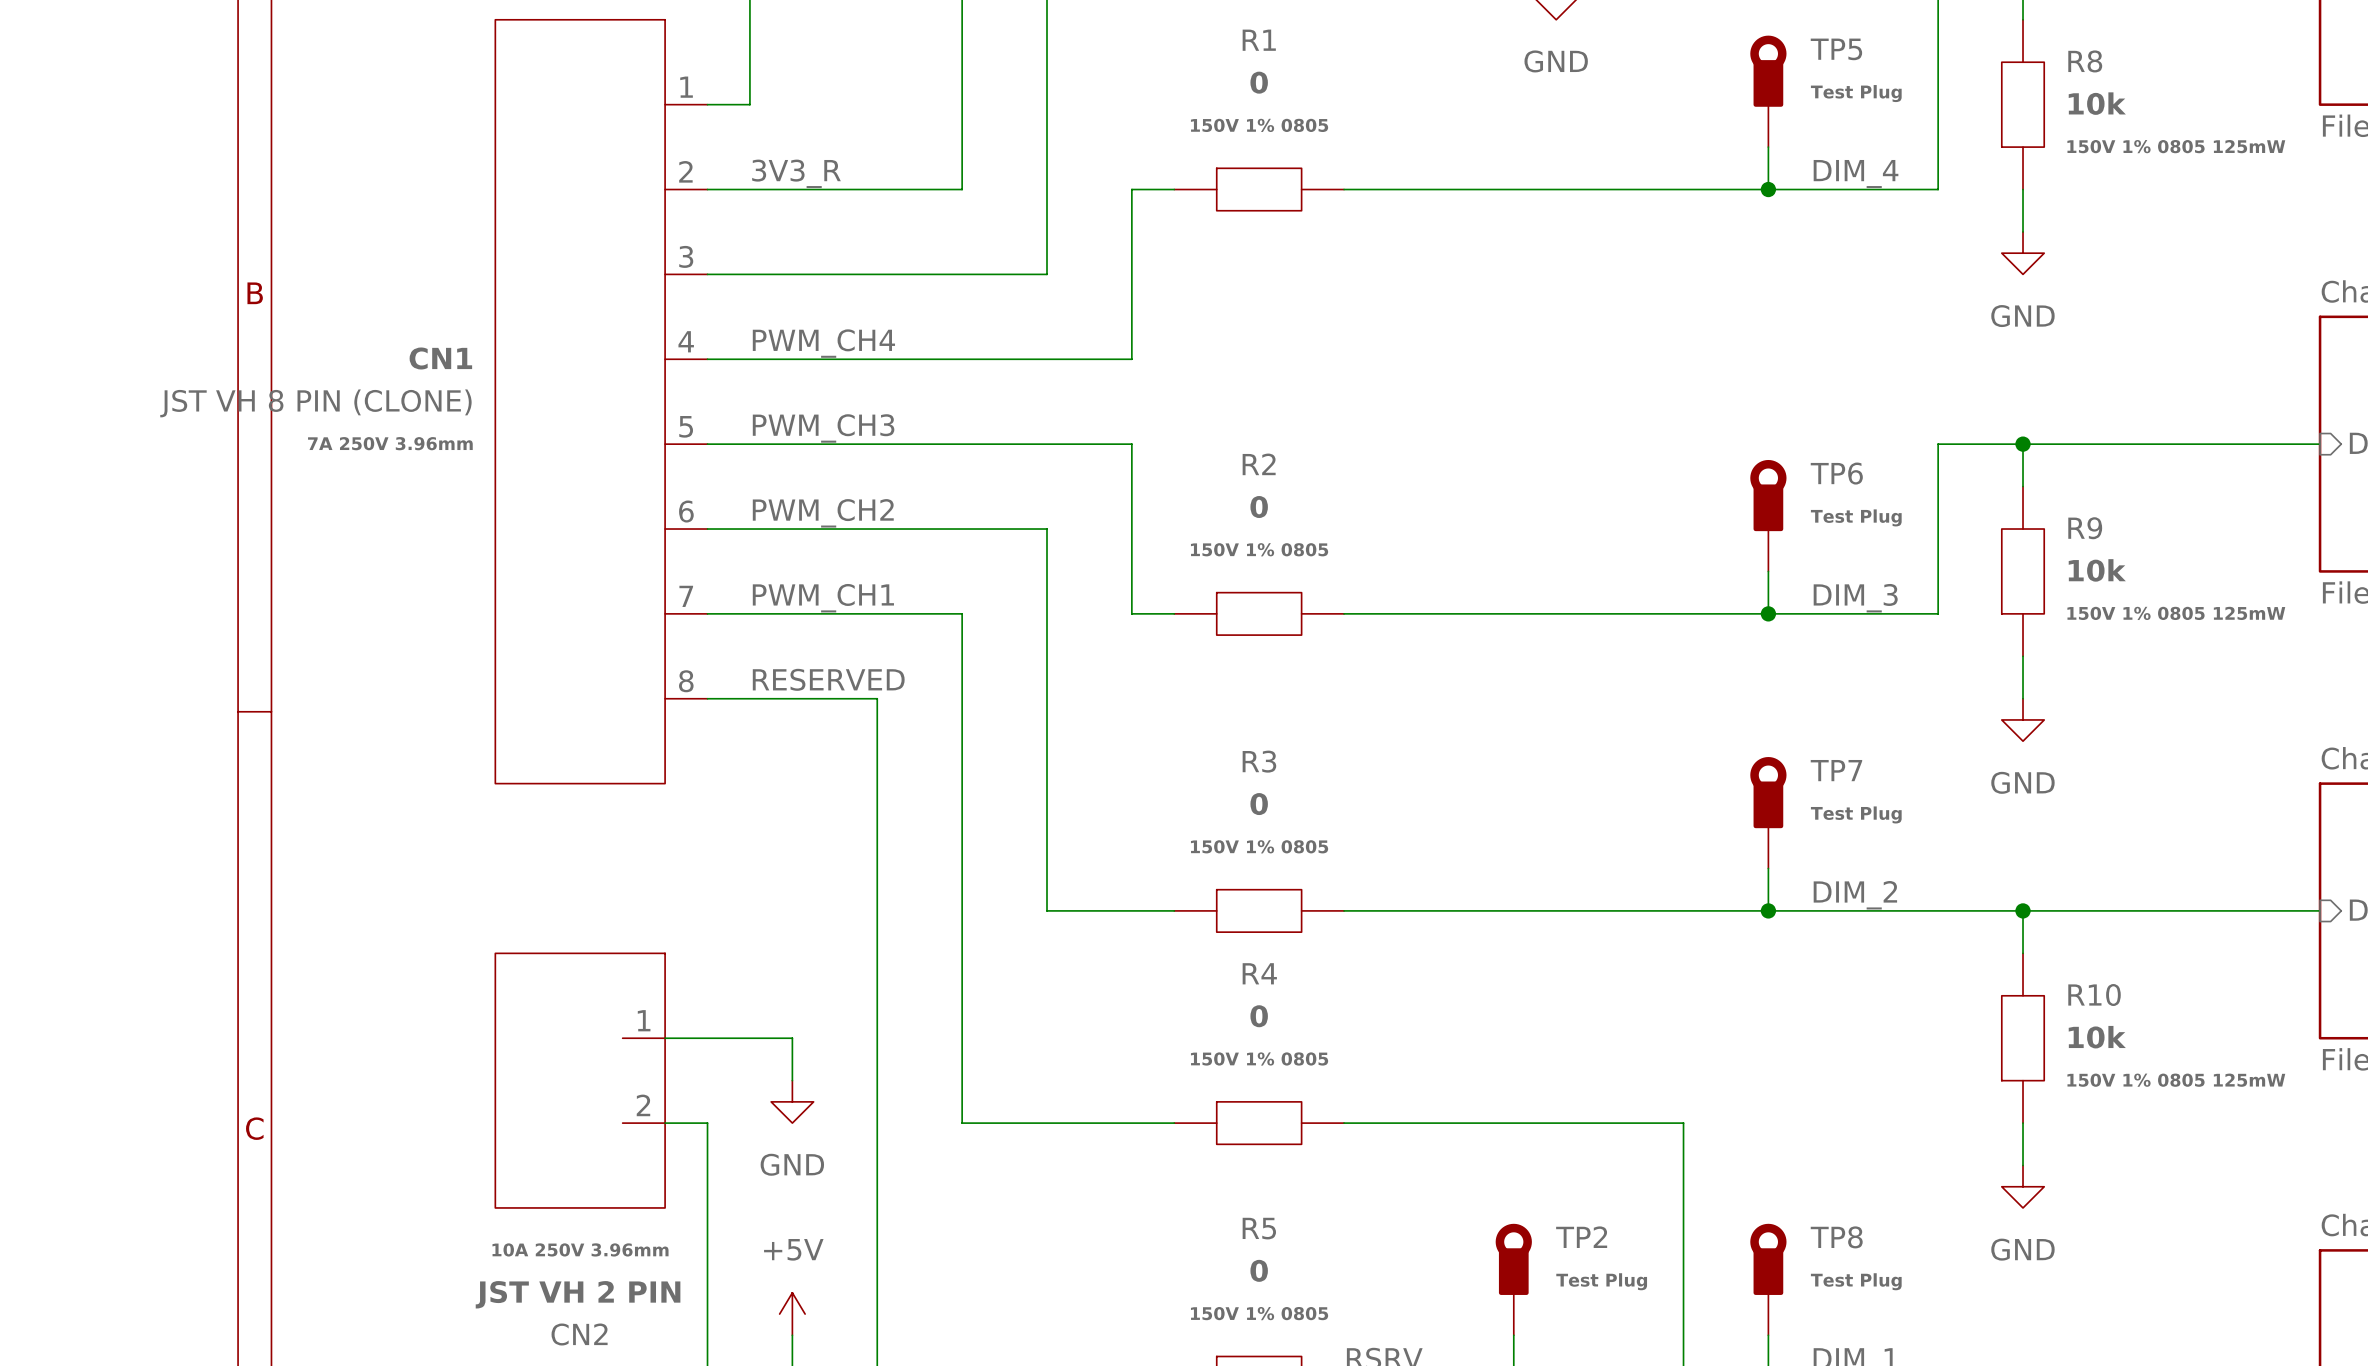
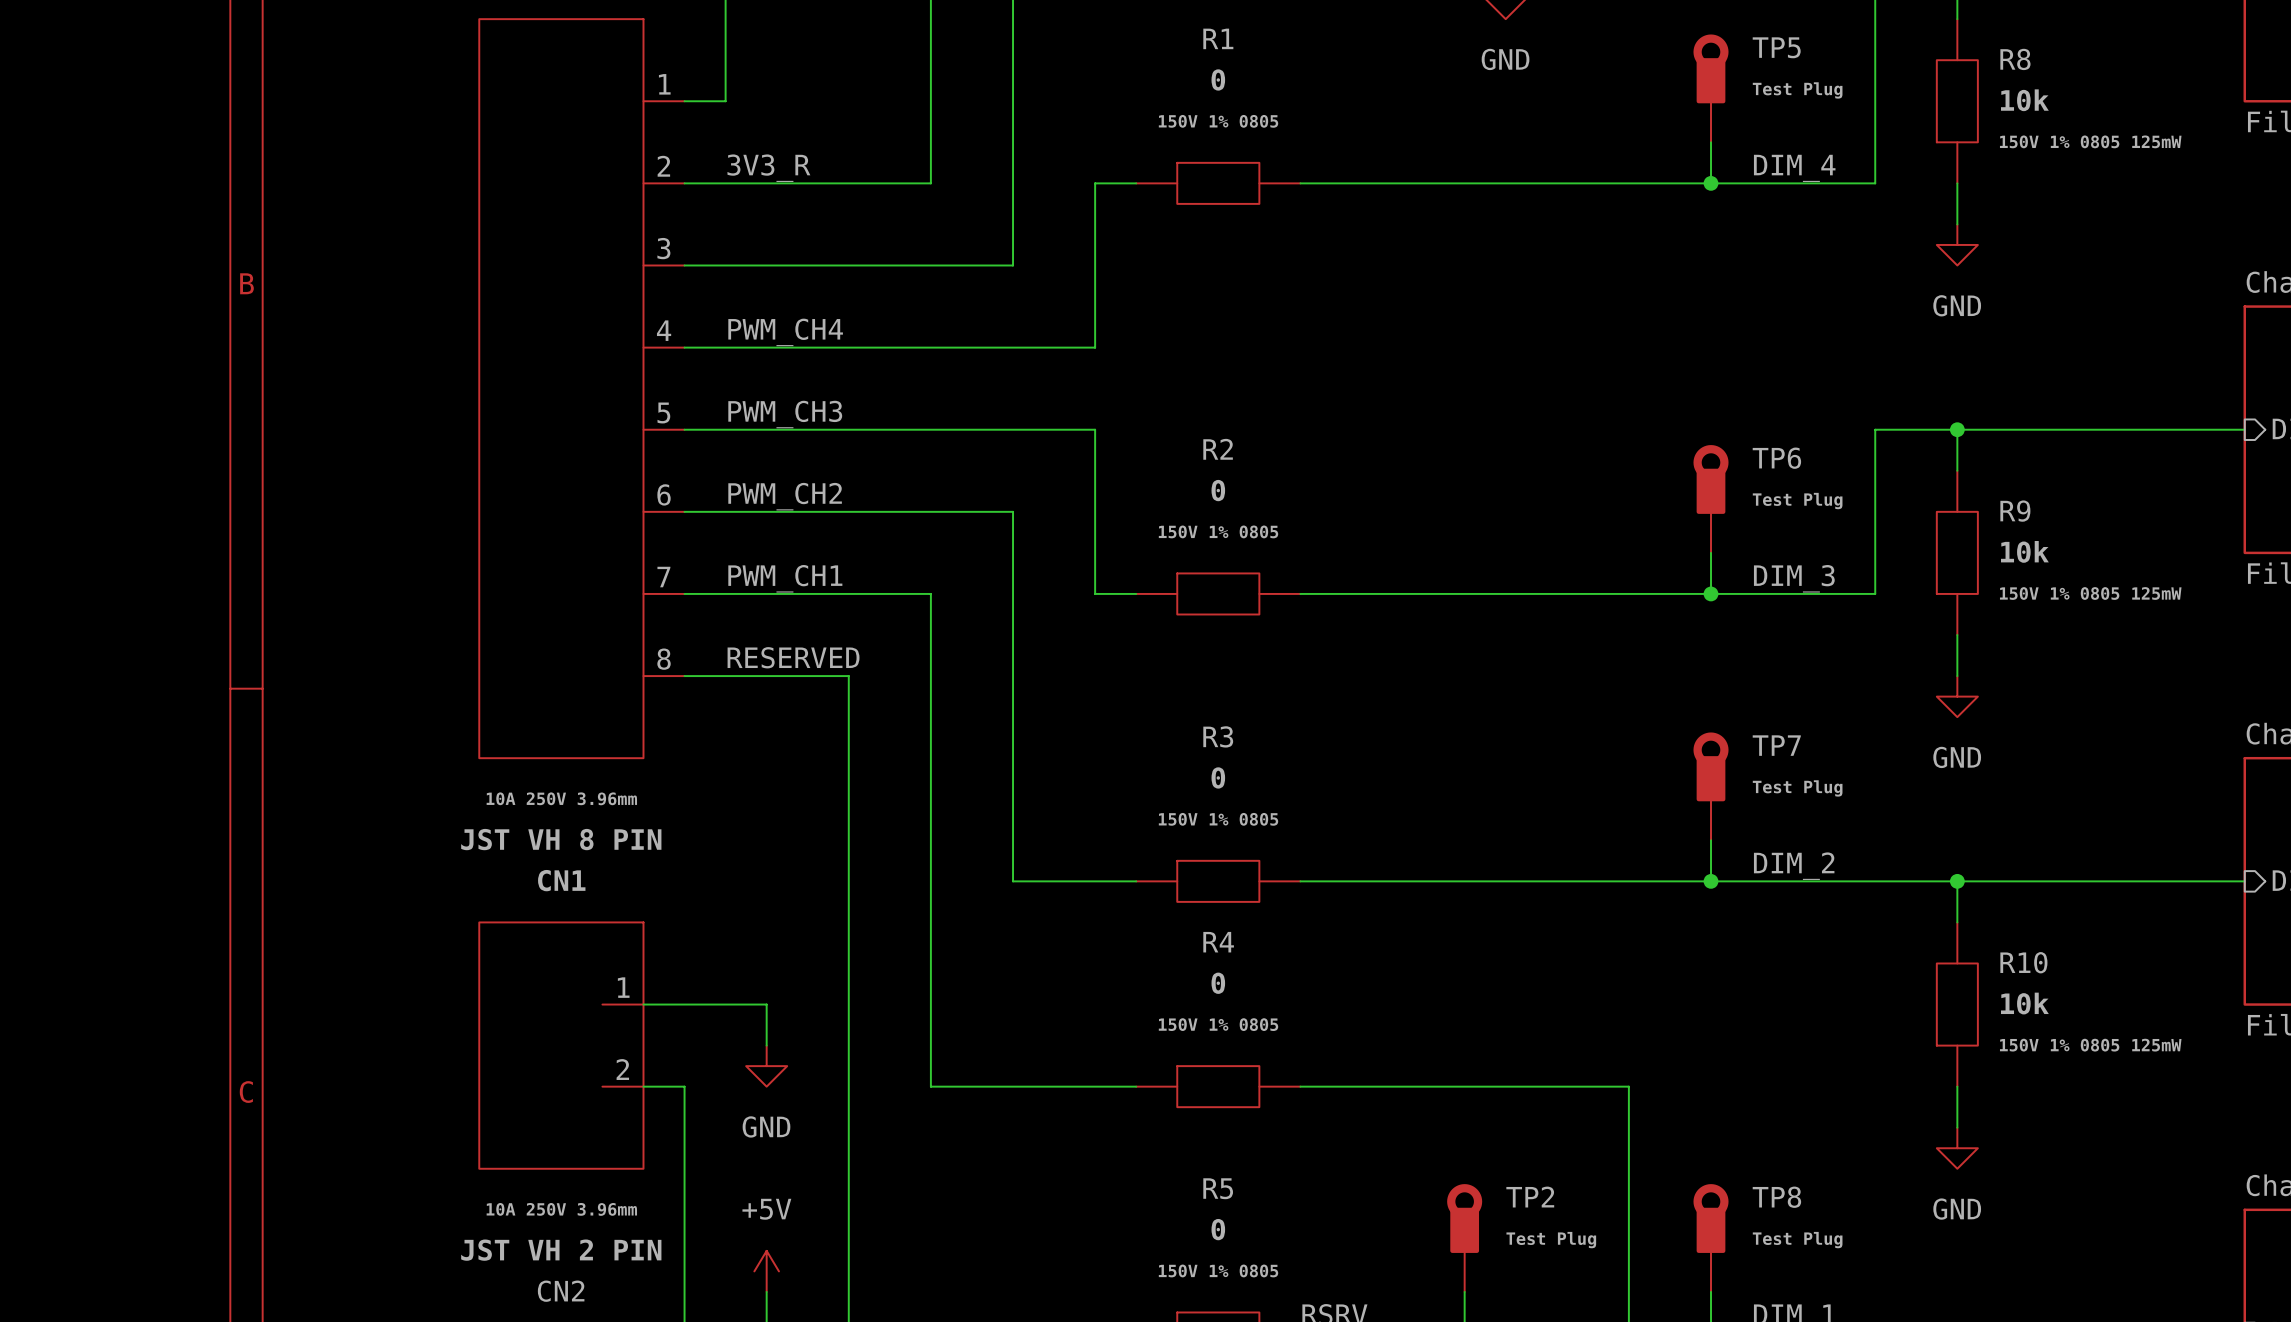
CN1 name position: CN1 (440, 358) -> CN1 (561, 880)
CN1 value: JST VH 8 PIN (CLONE) (315, 403) -> JST VH 8 PIN (561, 839)
CN1 text: 7A 250V 3.96mm (390, 443) -> 10A 250V 3.96mm (561, 798)

